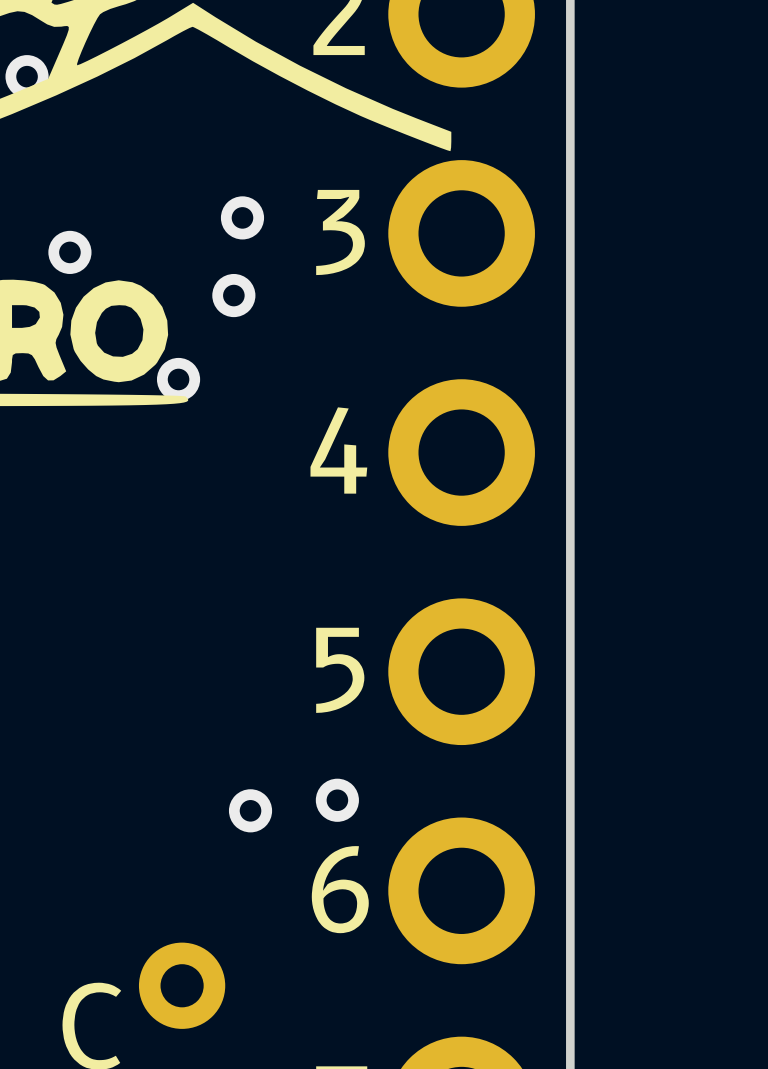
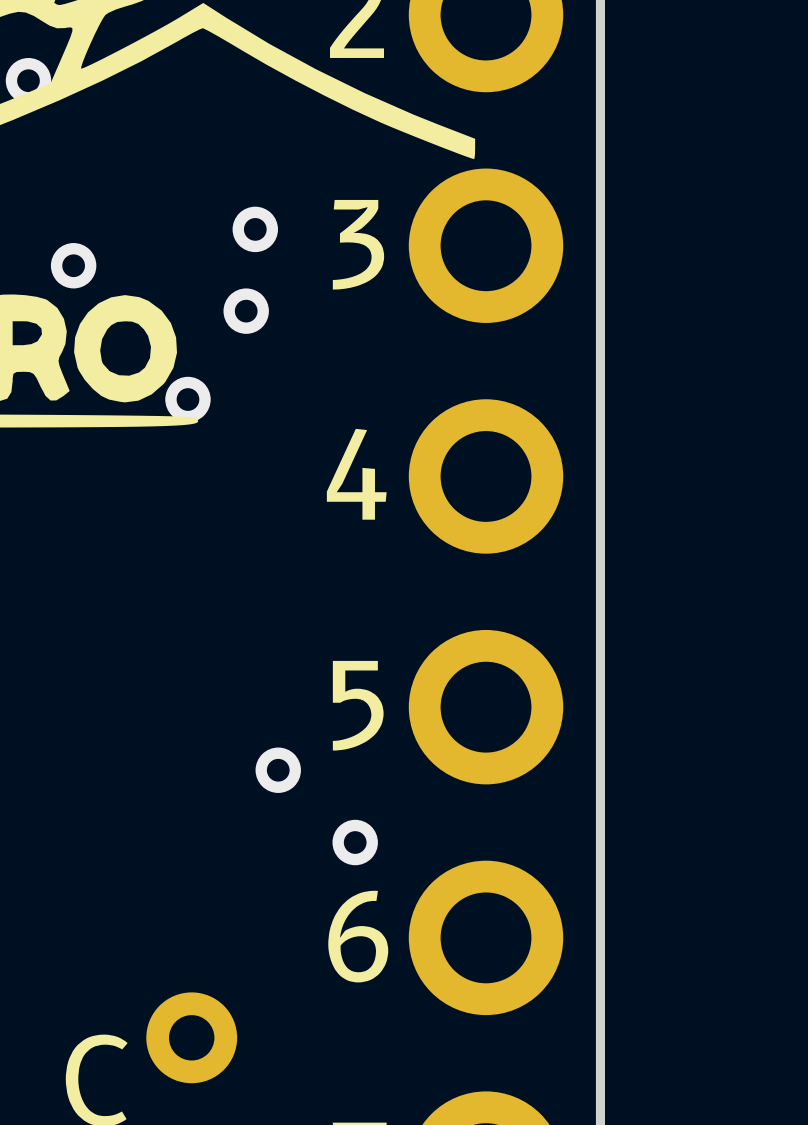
via position: (250, 810) -> (278, 770)

